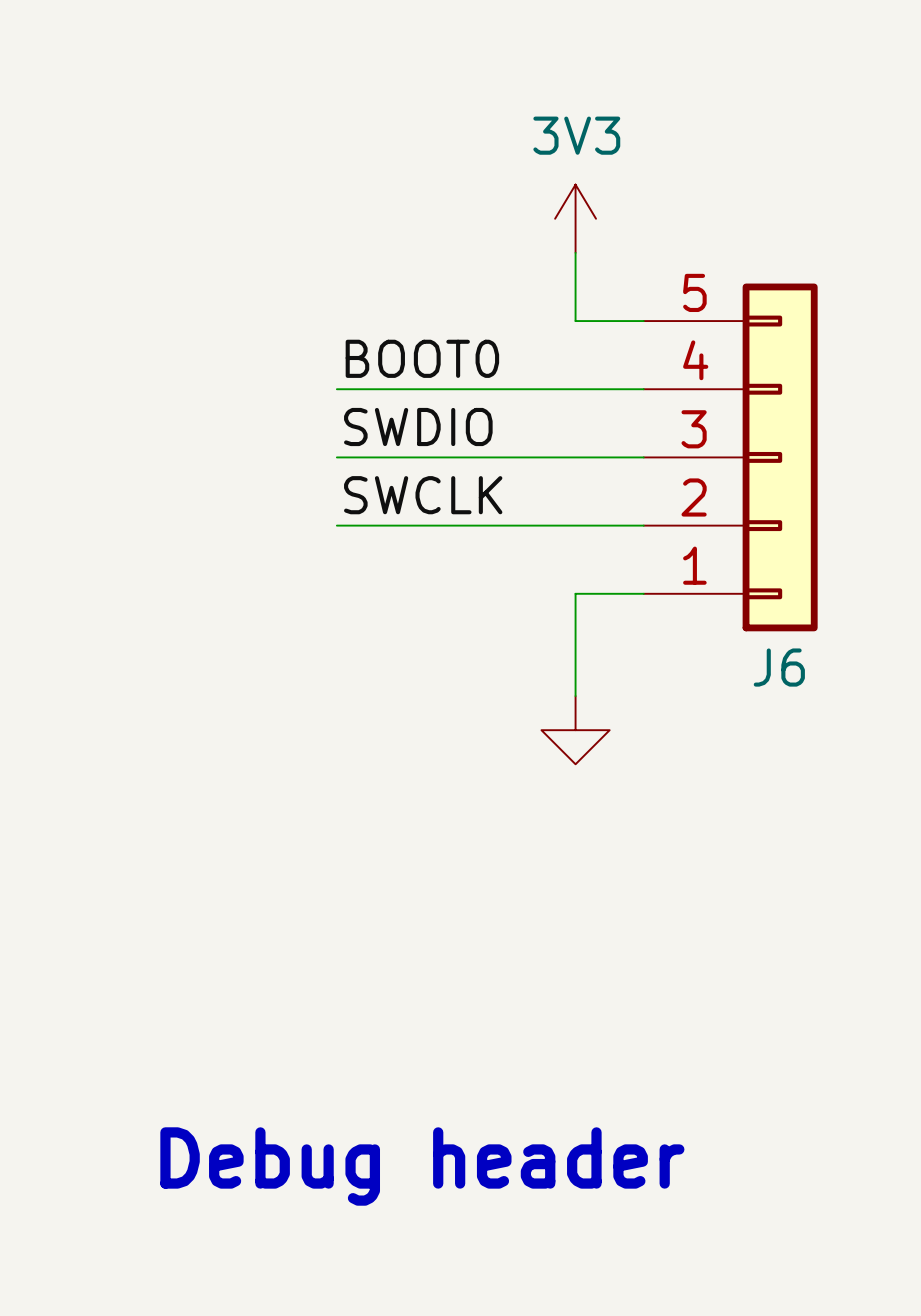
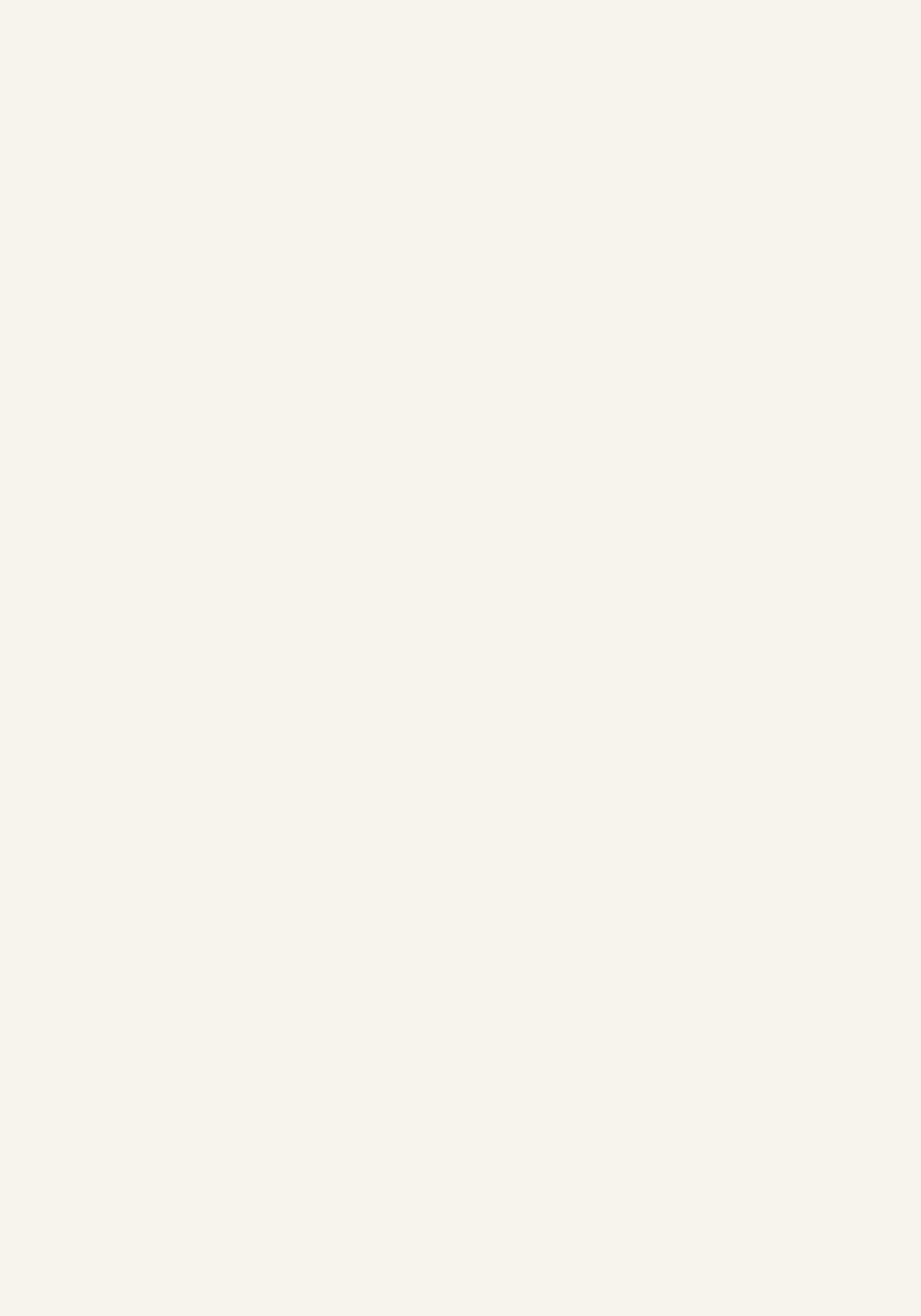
power symbol: 3V3 (575, 218) -> none
wire: (575, 252) (575, 321) (643, 321) -> none
label: BOOT0 (422, 358) -> none
wire: (336, 389) (643, 389) -> none
label: SWDIO (418, 427) -> none
wire: (336, 457) (643, 457) -> none
J6: (730, 457) -> none
label: SWCLK (423, 495) -> none
wire: (336, 525) (643, 525) -> none
wire: (643, 593) (575, 593) (575, 696) -> none
power symbol: (575, 730) -> none
text: Debug header (422, 1166) -> none

